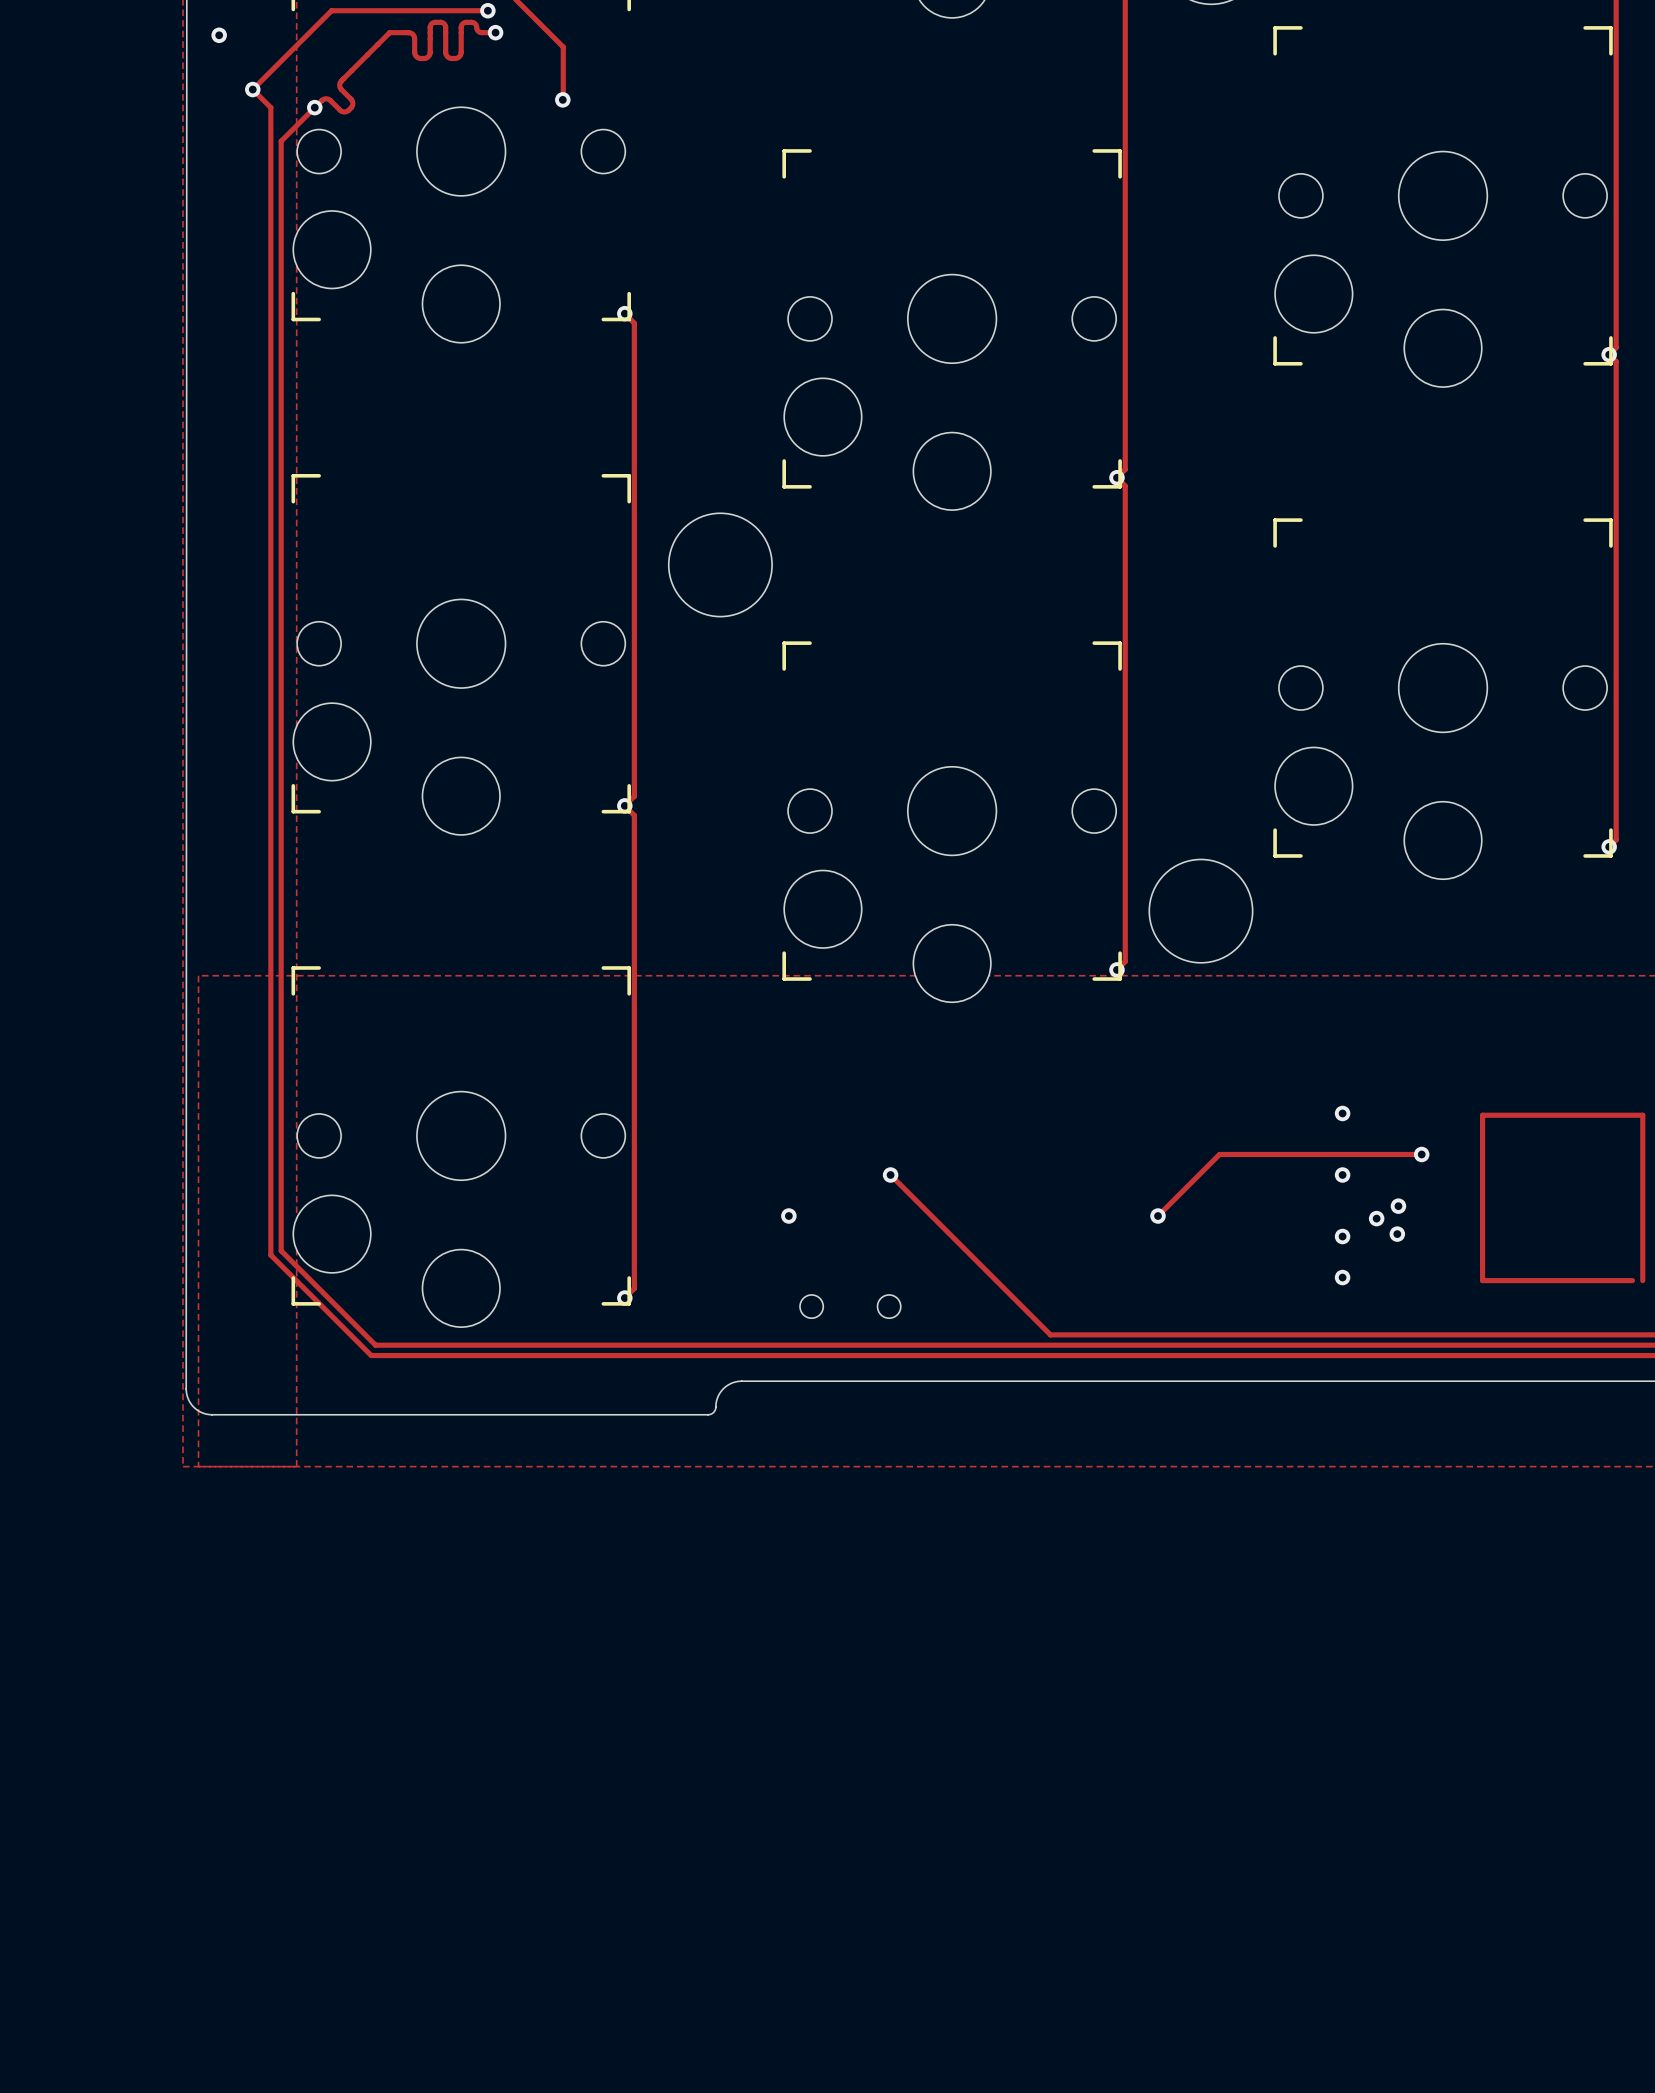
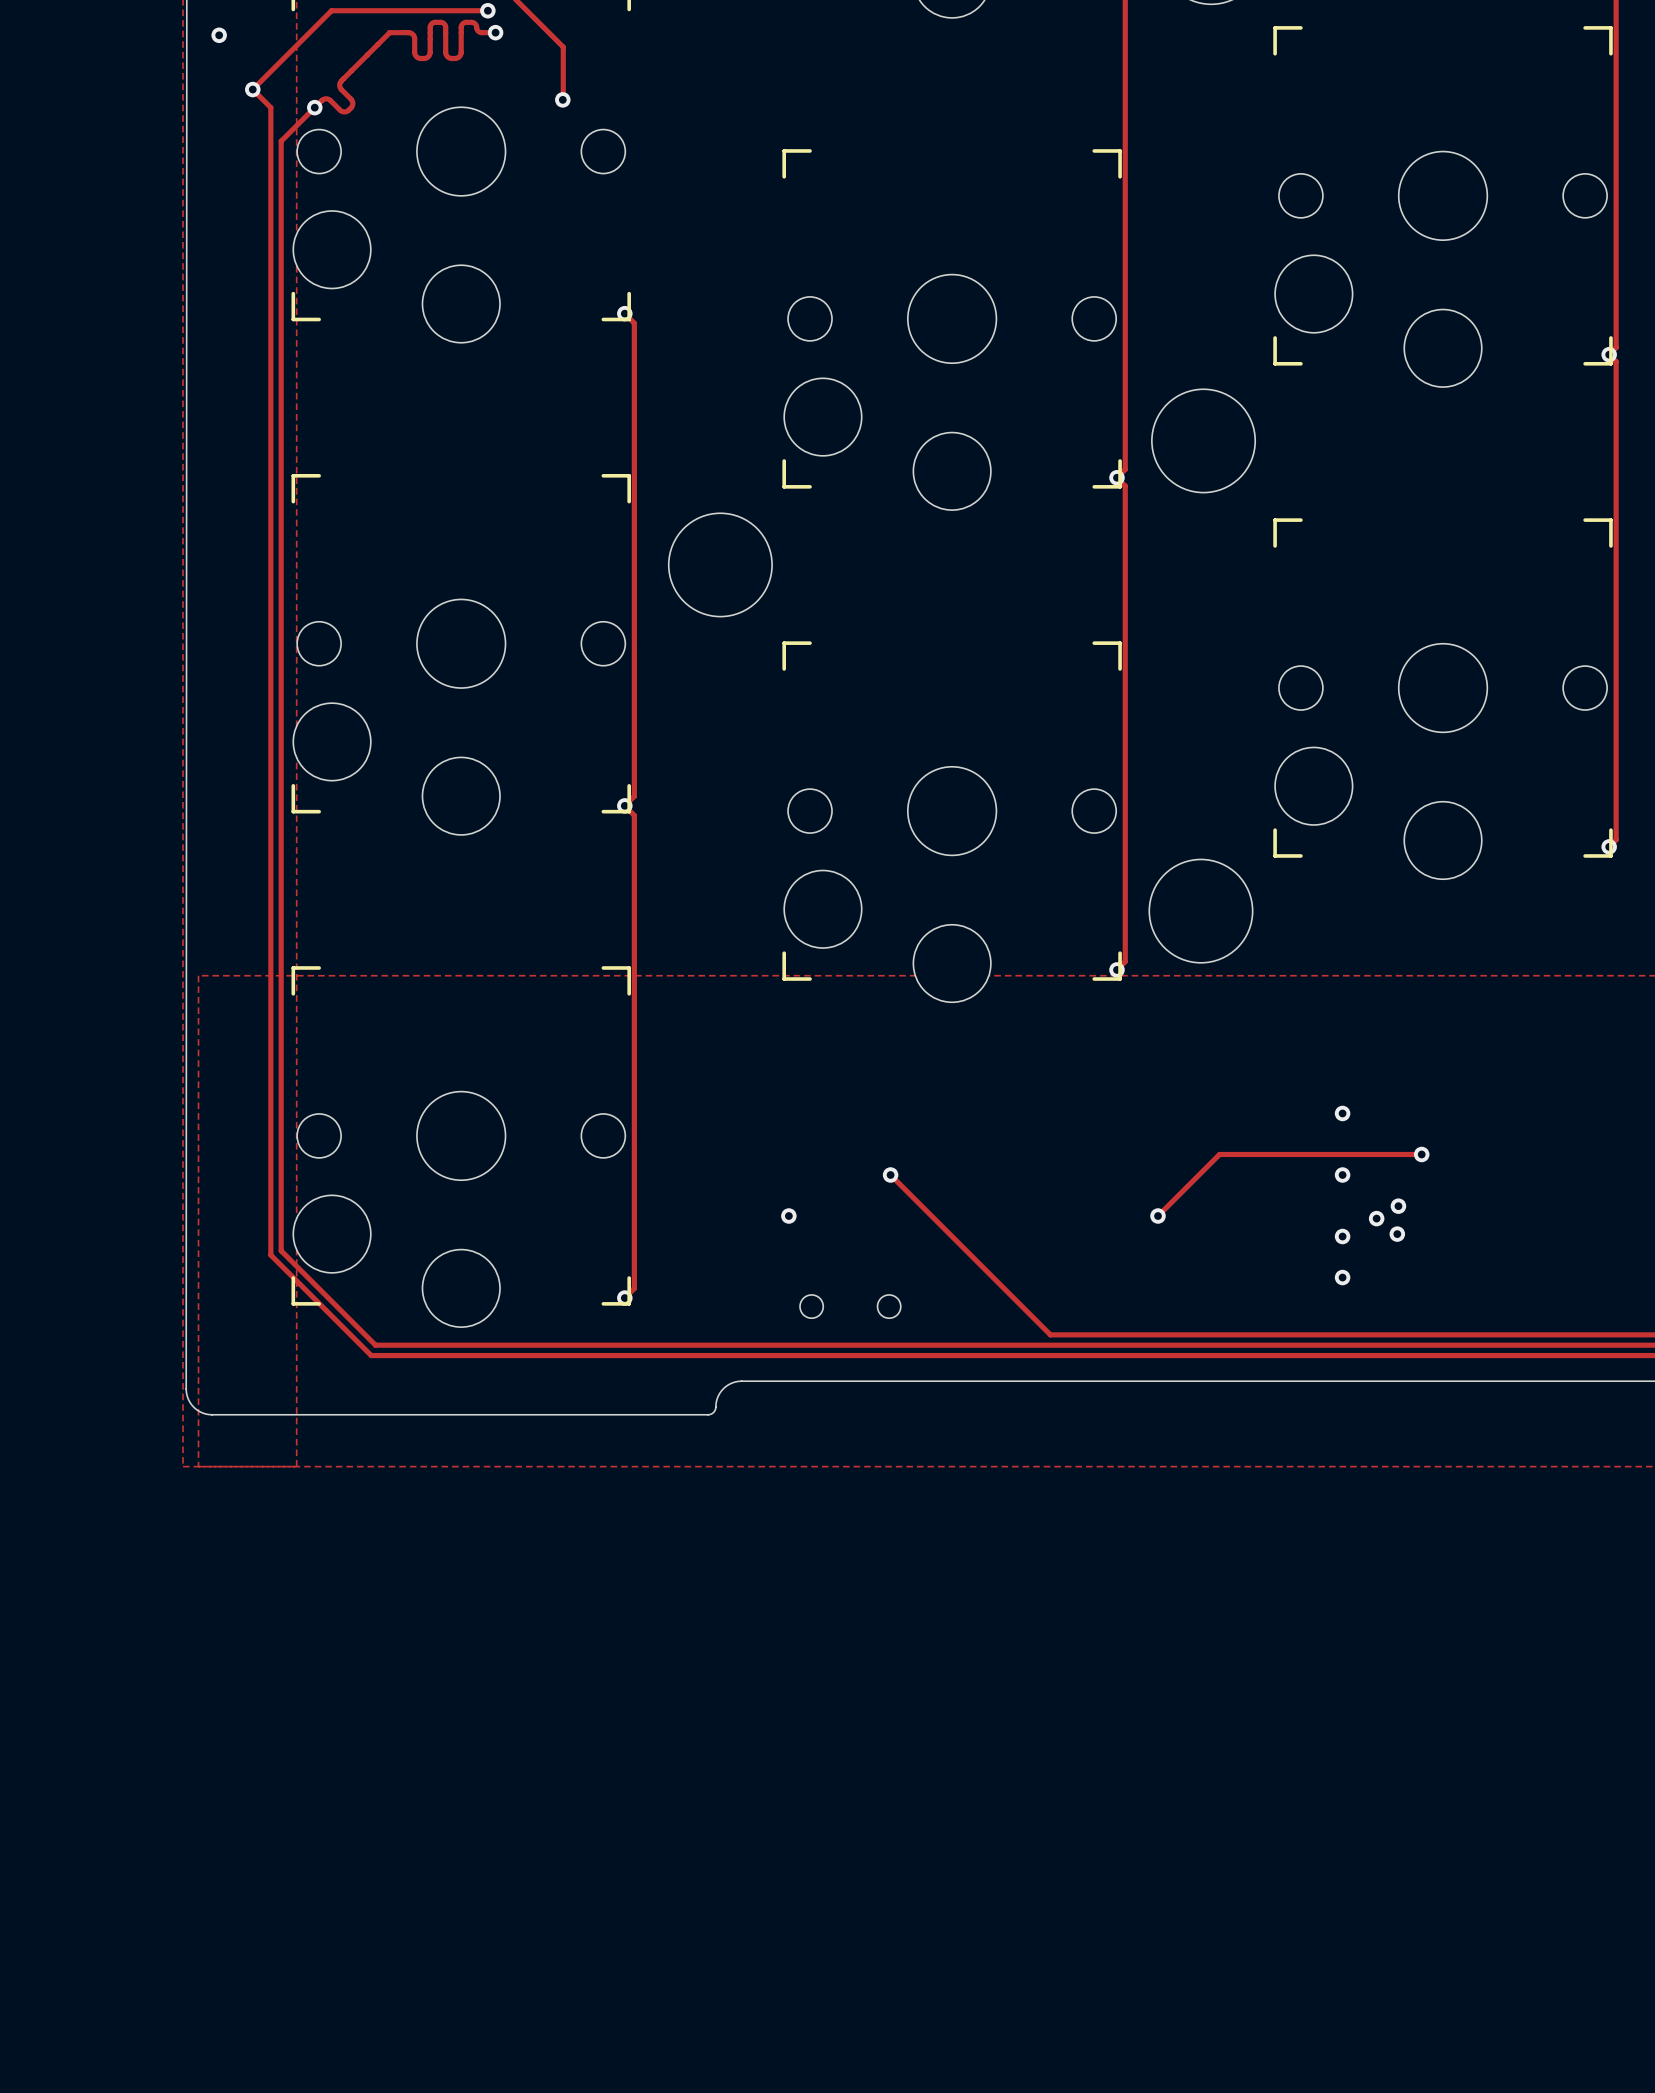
round board edge: none -> [1151, 388, 1256, 494]
track: (1632, 1280) (1482, 1280) (1482, 1115) (1642, 1115) (1642, 1280) -> none

